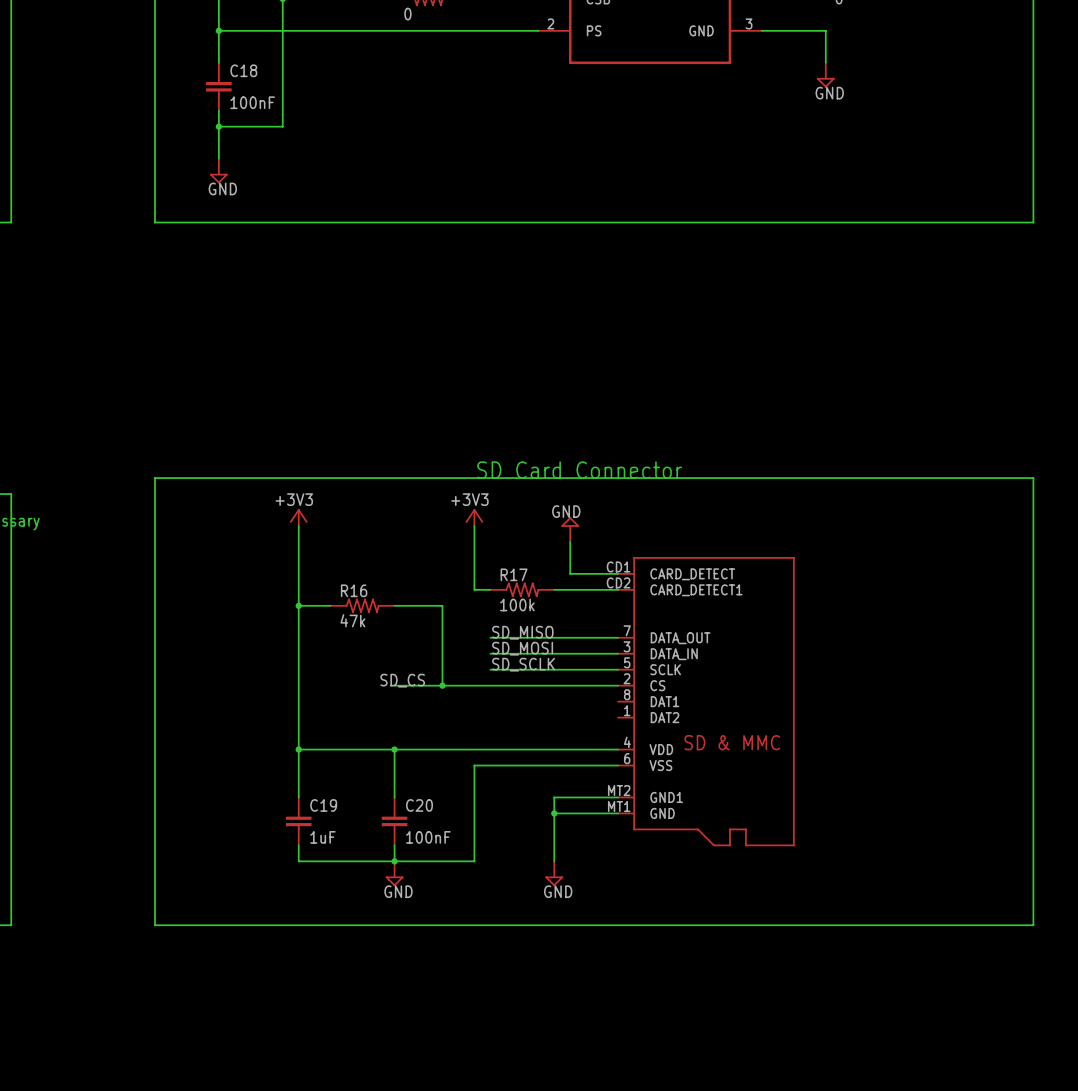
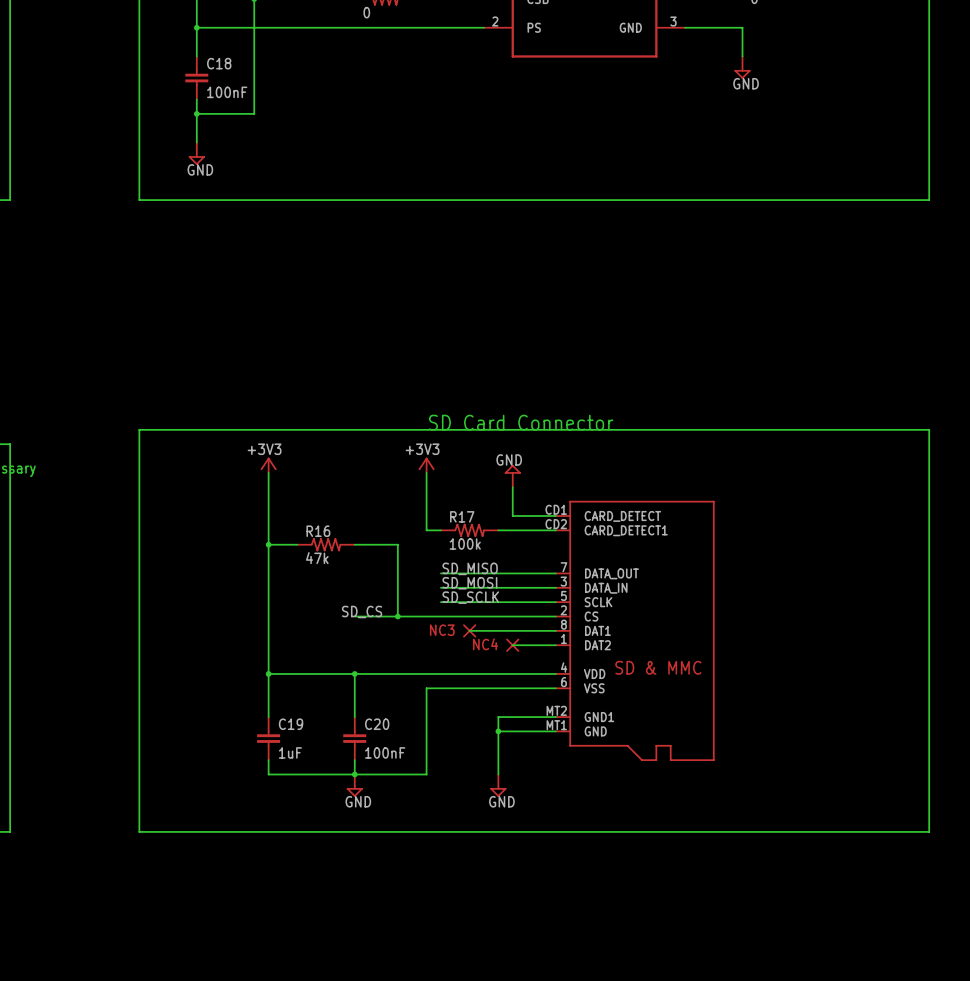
wire: none -> (469, 630) (555, 630)
NC3: none -> (469, 630)
wire: none -> (512, 645) (555, 645)
NC4: none -> (512, 645)

